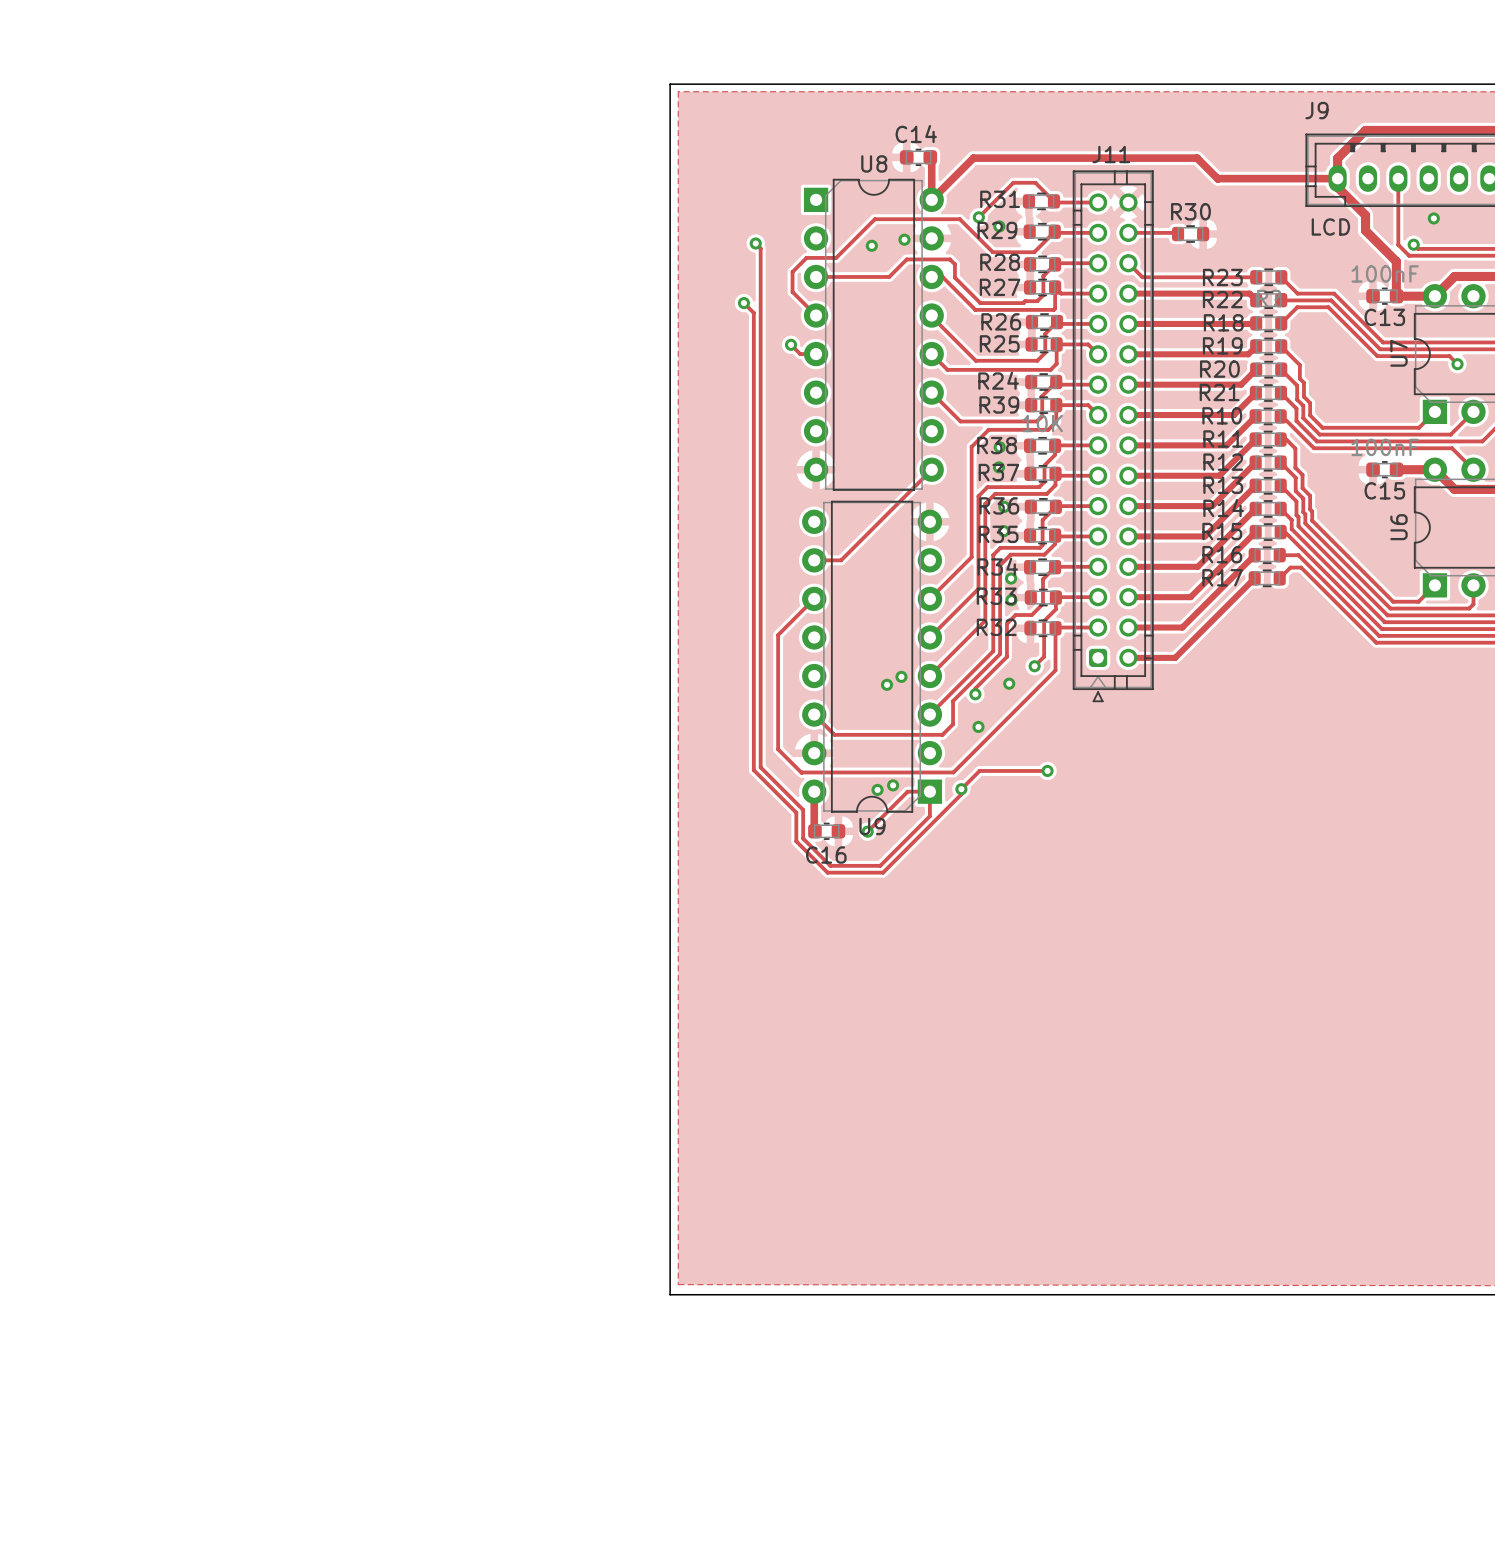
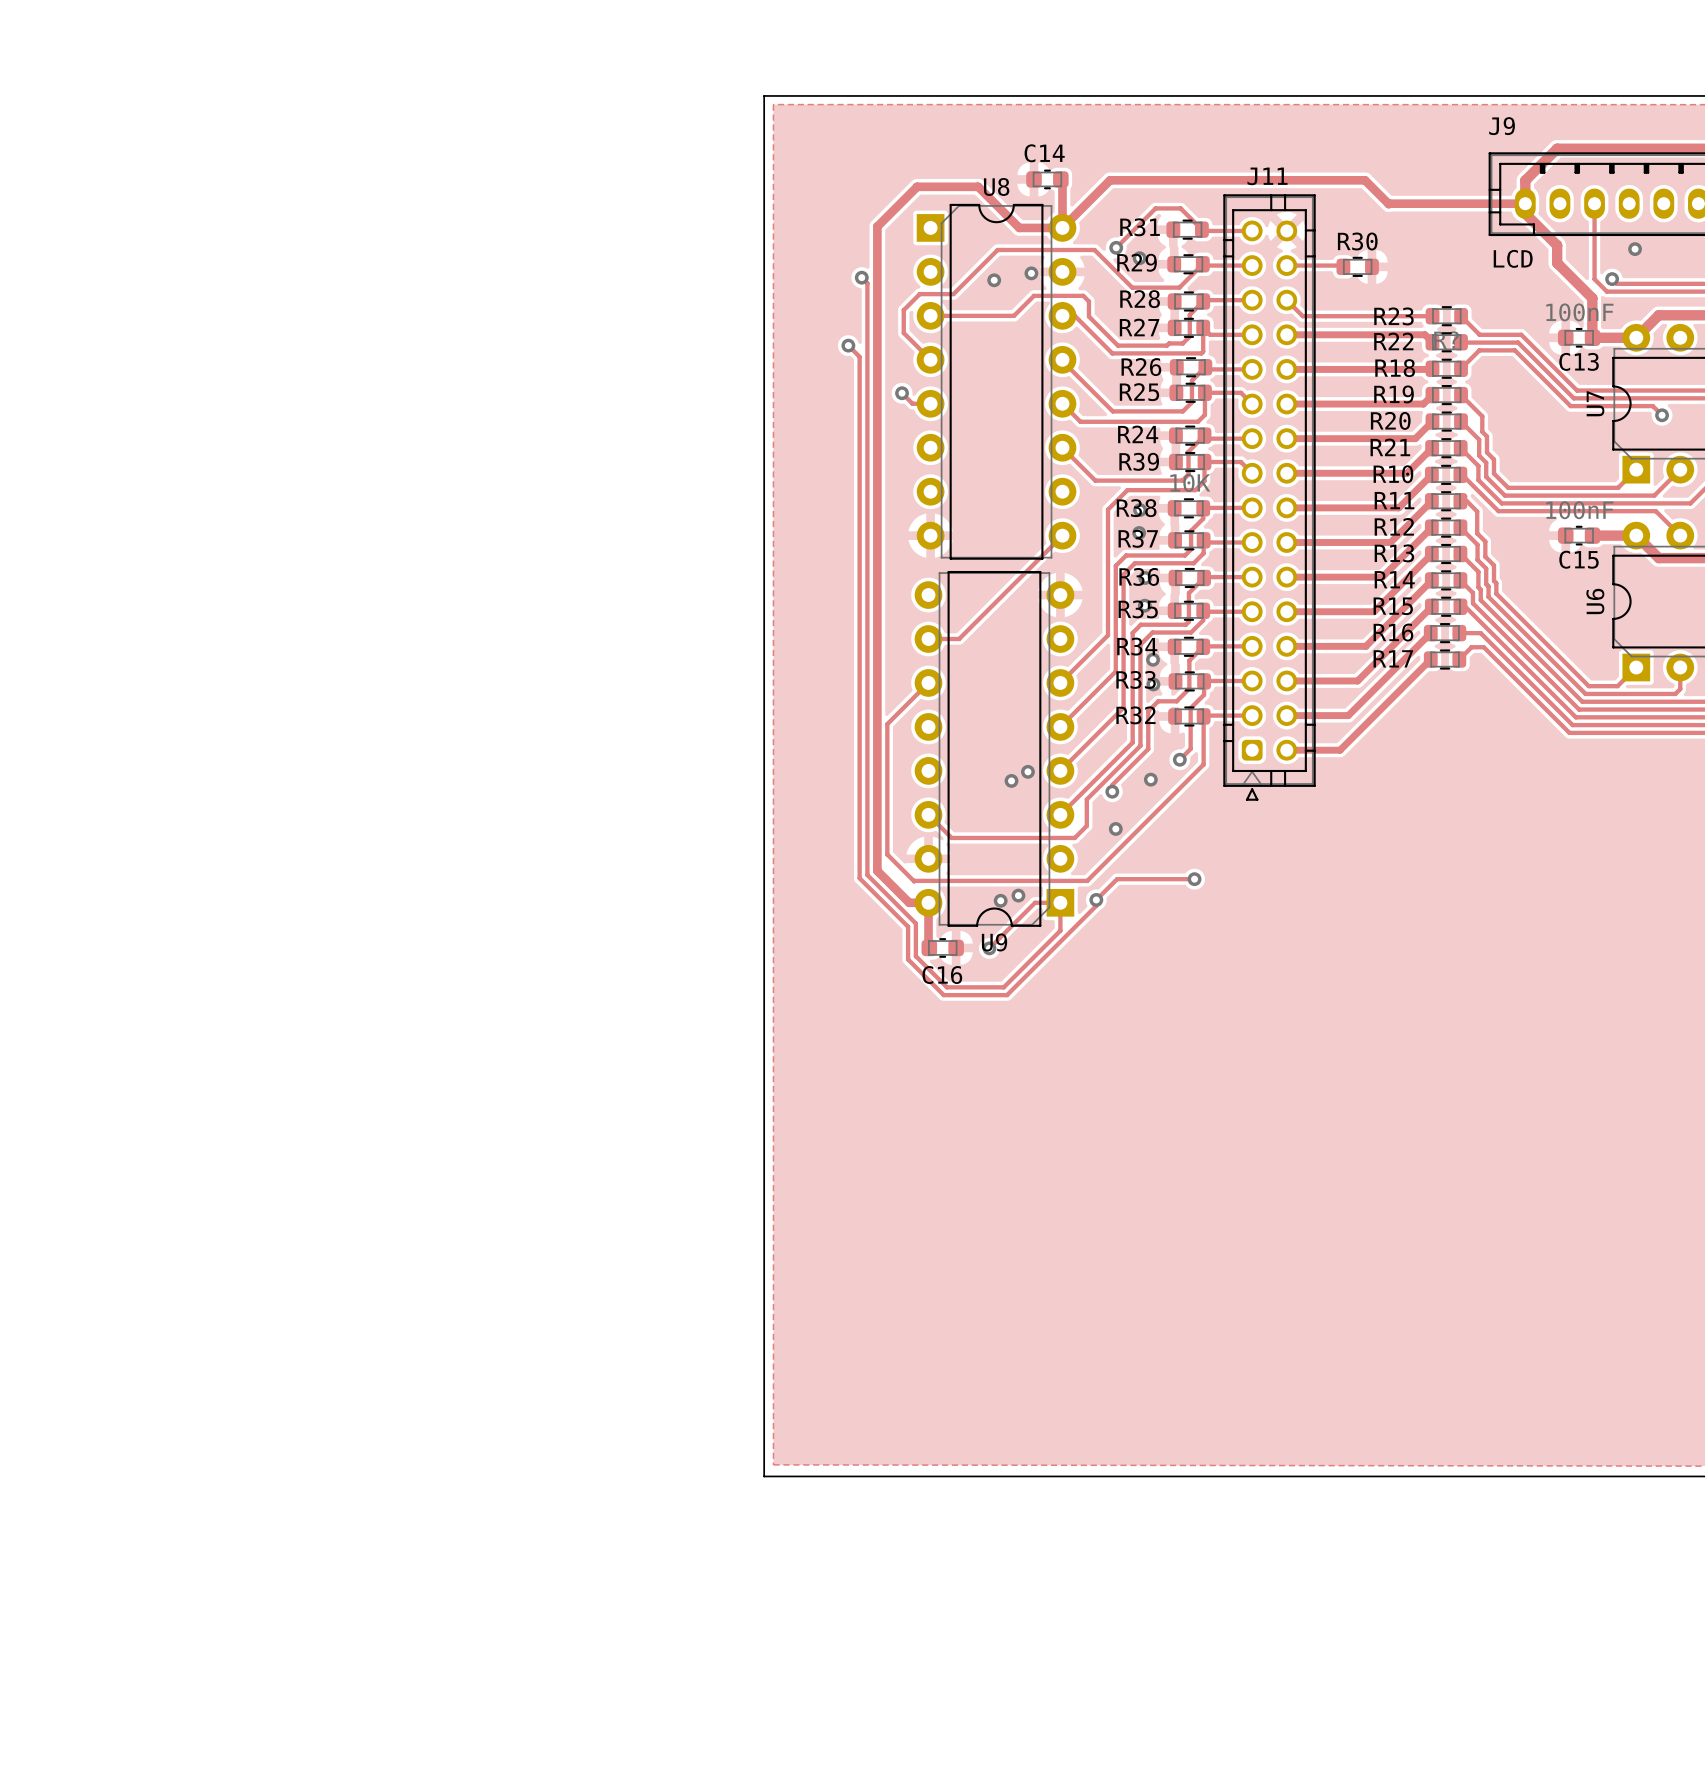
track: none -> (1062, 227) (1019, 227) (978, 186) (917, 186) (877, 226) (877, 870) (909, 902) (928, 902)

